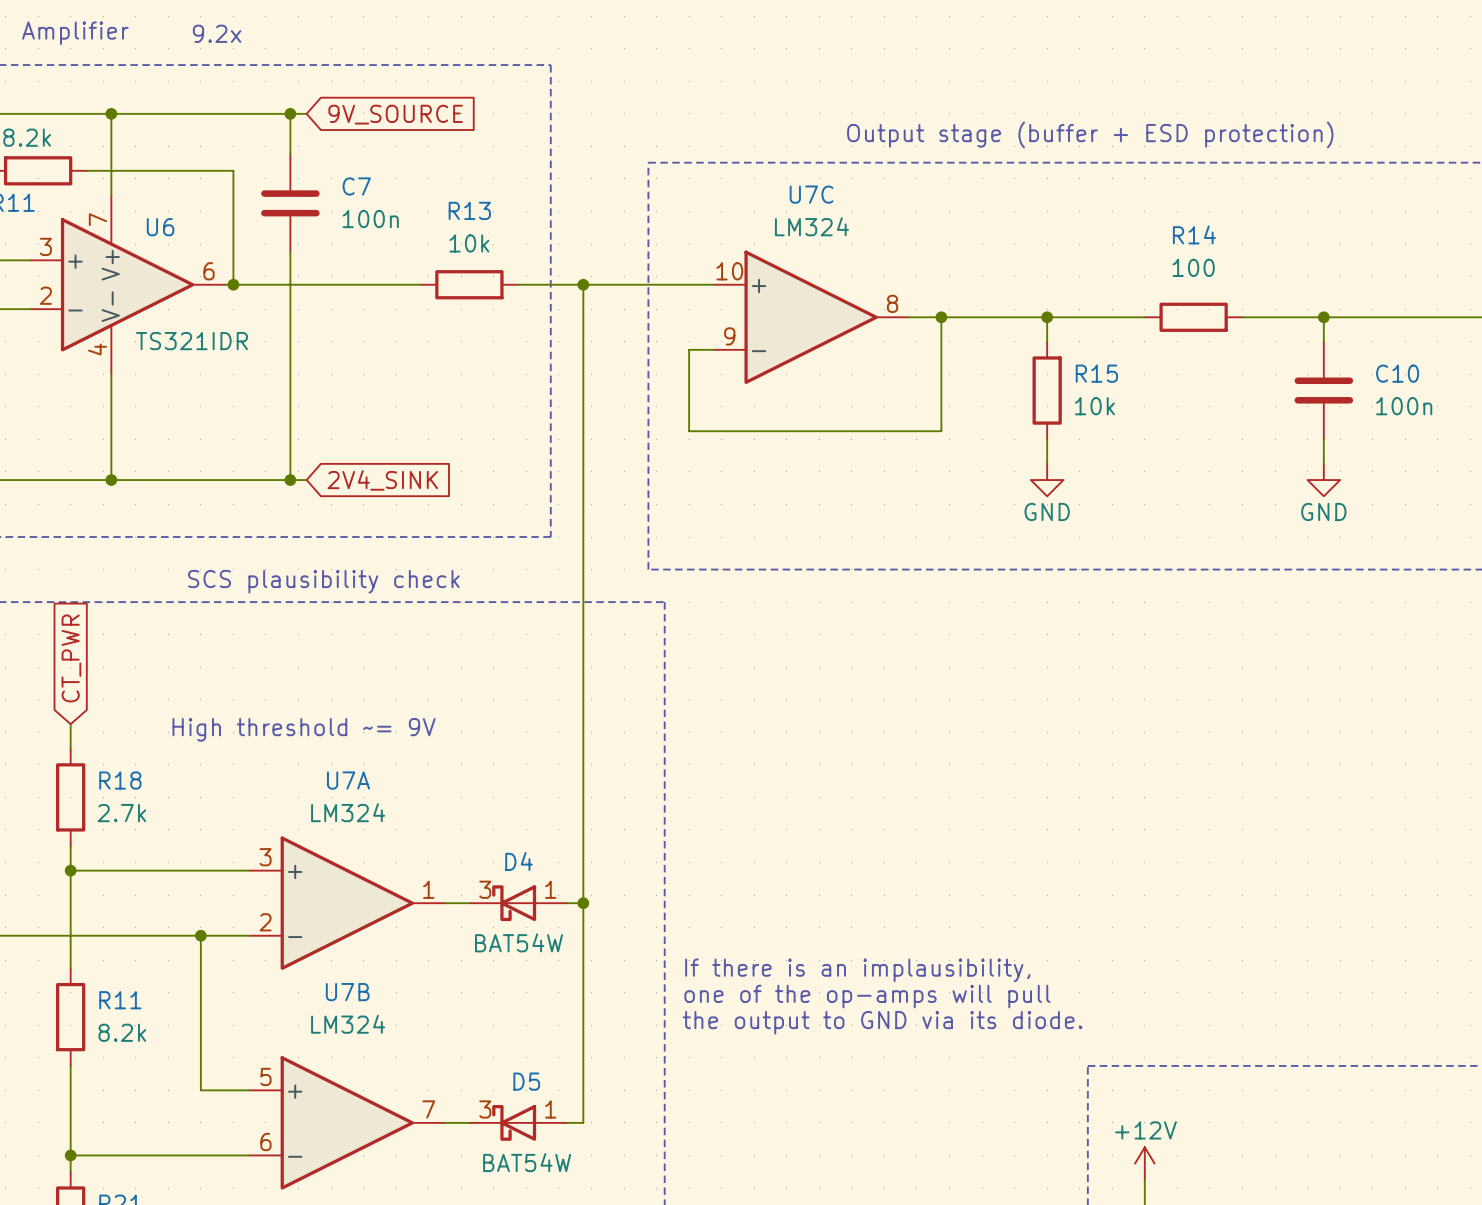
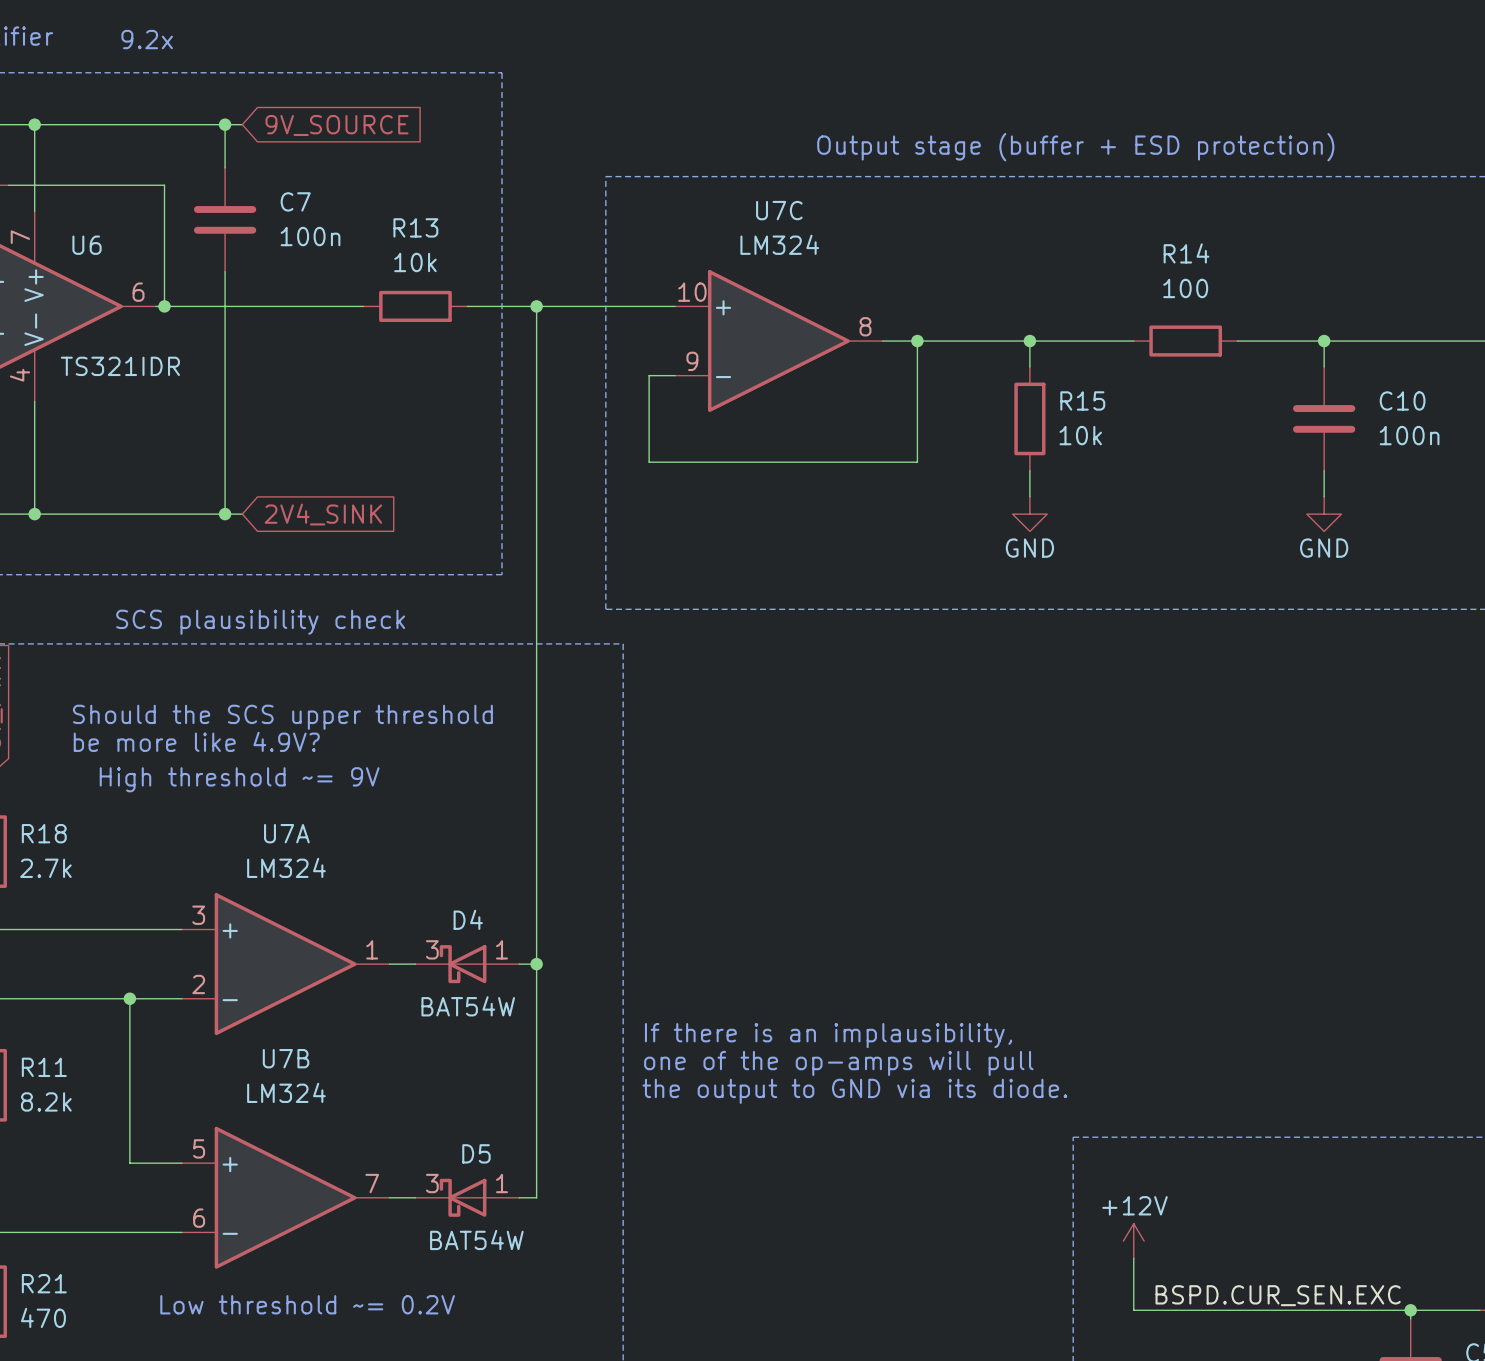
text: none -> Should the SCS upper threshold (282, 717)
text: none -> be more like 4.9V? (196, 741)

